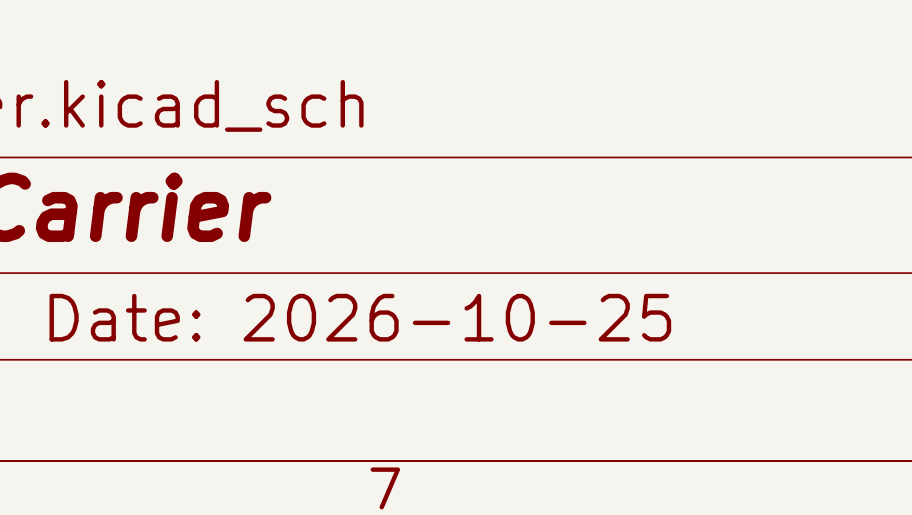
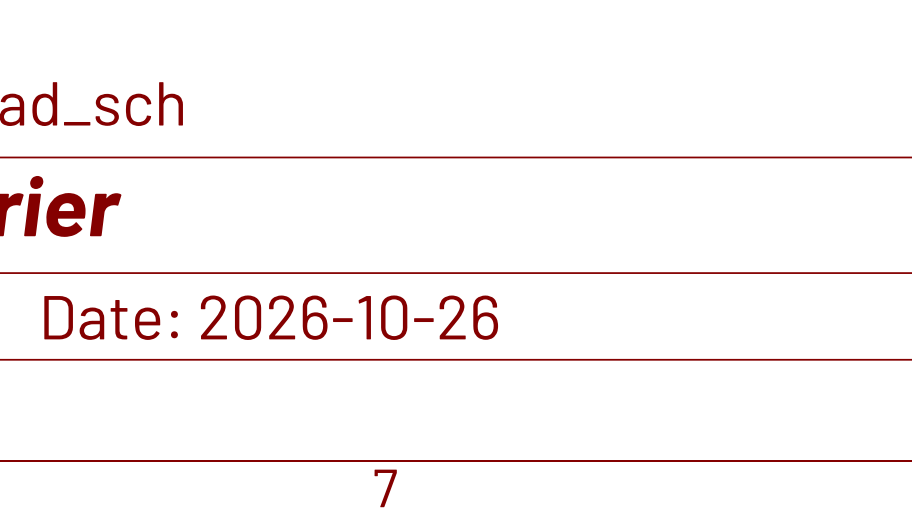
title block: Date: 2026-10-25 (360, 317) -> Date: 2026-10-26 (271, 317)

